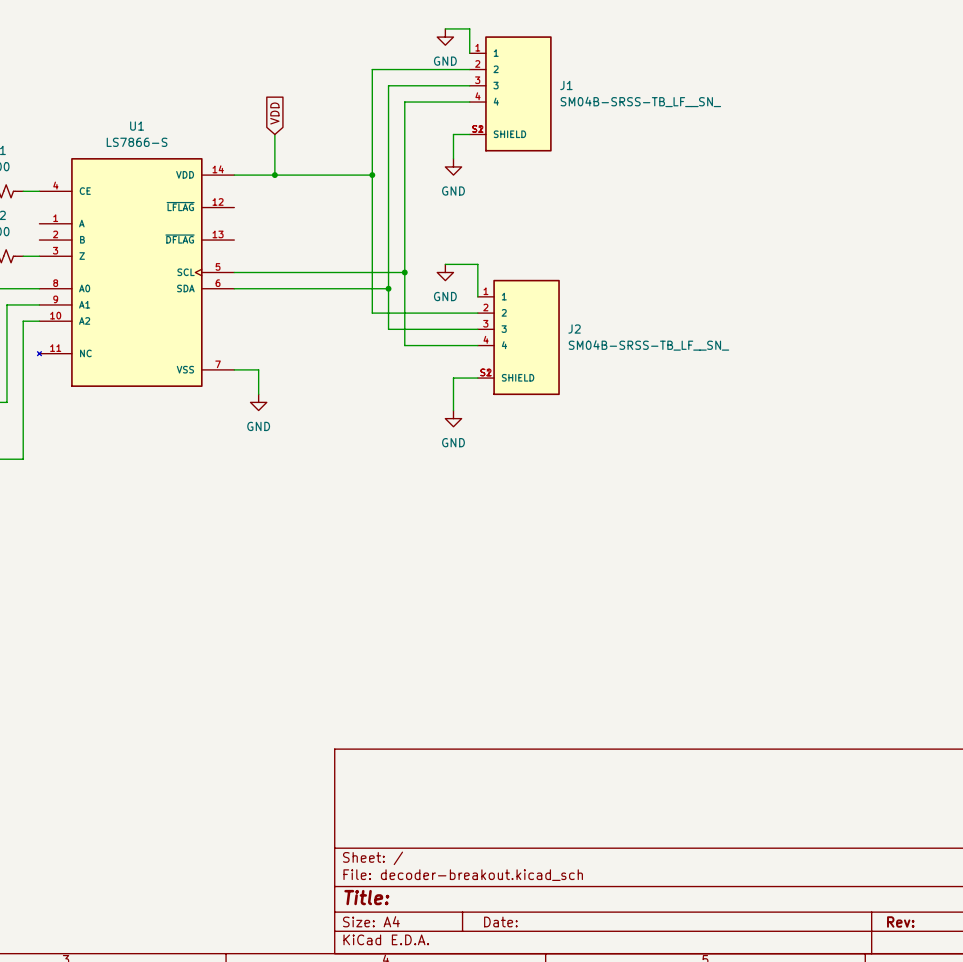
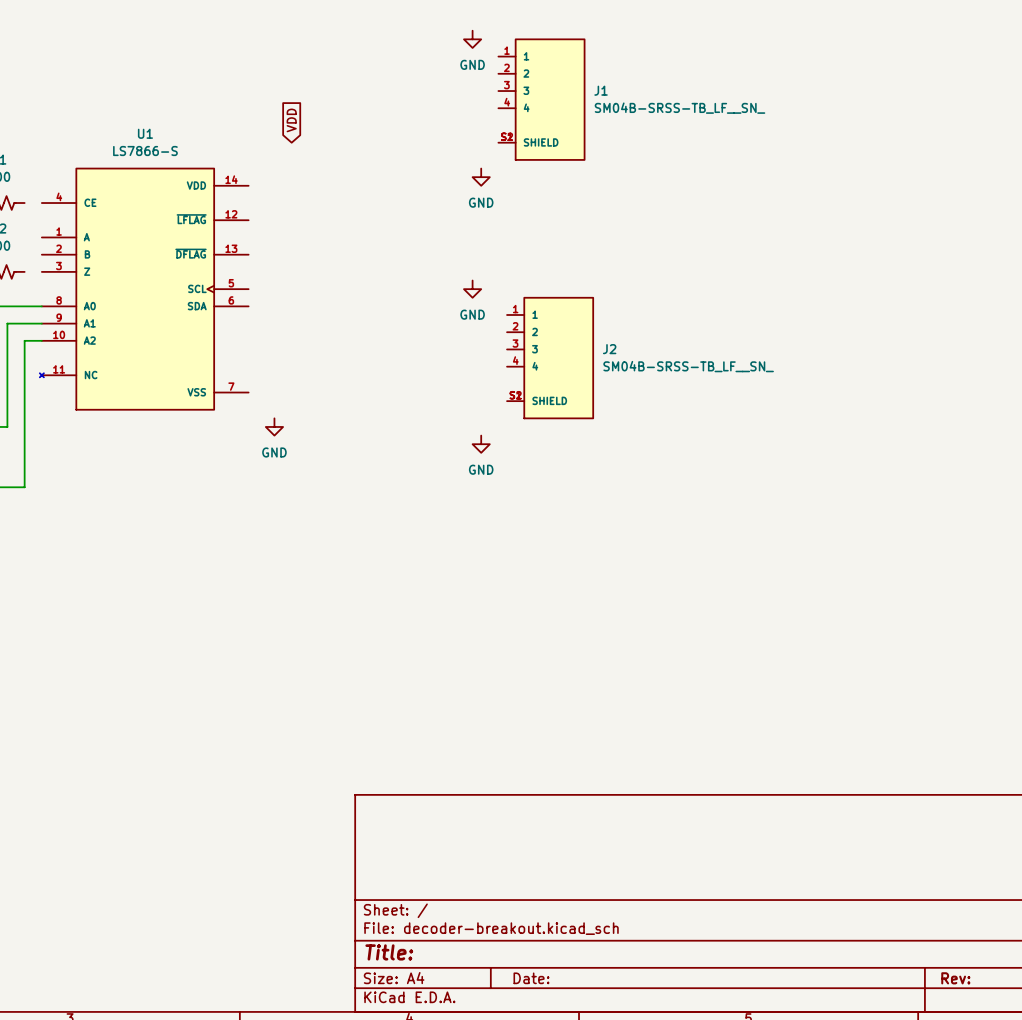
wire: (445, 28) (469, 28) (469, 53) -> none
wire: (469, 69) (372, 69) (372, 313) (477, 313) -> none
wire: (469, 85) (388, 85) (388, 329) (477, 329) -> none
wire: (469, 102) (404, 102) (404, 345) (477, 345) -> none
wire: (274, 134) (274, 175) -> none
wire: (469, 134) (453, 134) (453, 158) -> none
wire: (234, 175) (372, 175) -> none
junction: (274, 175) -> none
junction: (372, 175) -> none
wire: (23, 191) (39, 191) -> none
wire: (23, 256) (39, 256) -> none
wire: (445, 264) (477, 264) (477, 296) -> none
wire: (234, 272) (404, 272) -> none
junction: (404, 272) -> none
wire: (234, 288) (388, 288) -> none
junction: (388, 288) -> none
wire: (234, 369) (258, 369) (258, 394) -> none
wire: (477, 378) (453, 378) (453, 410) -> none

